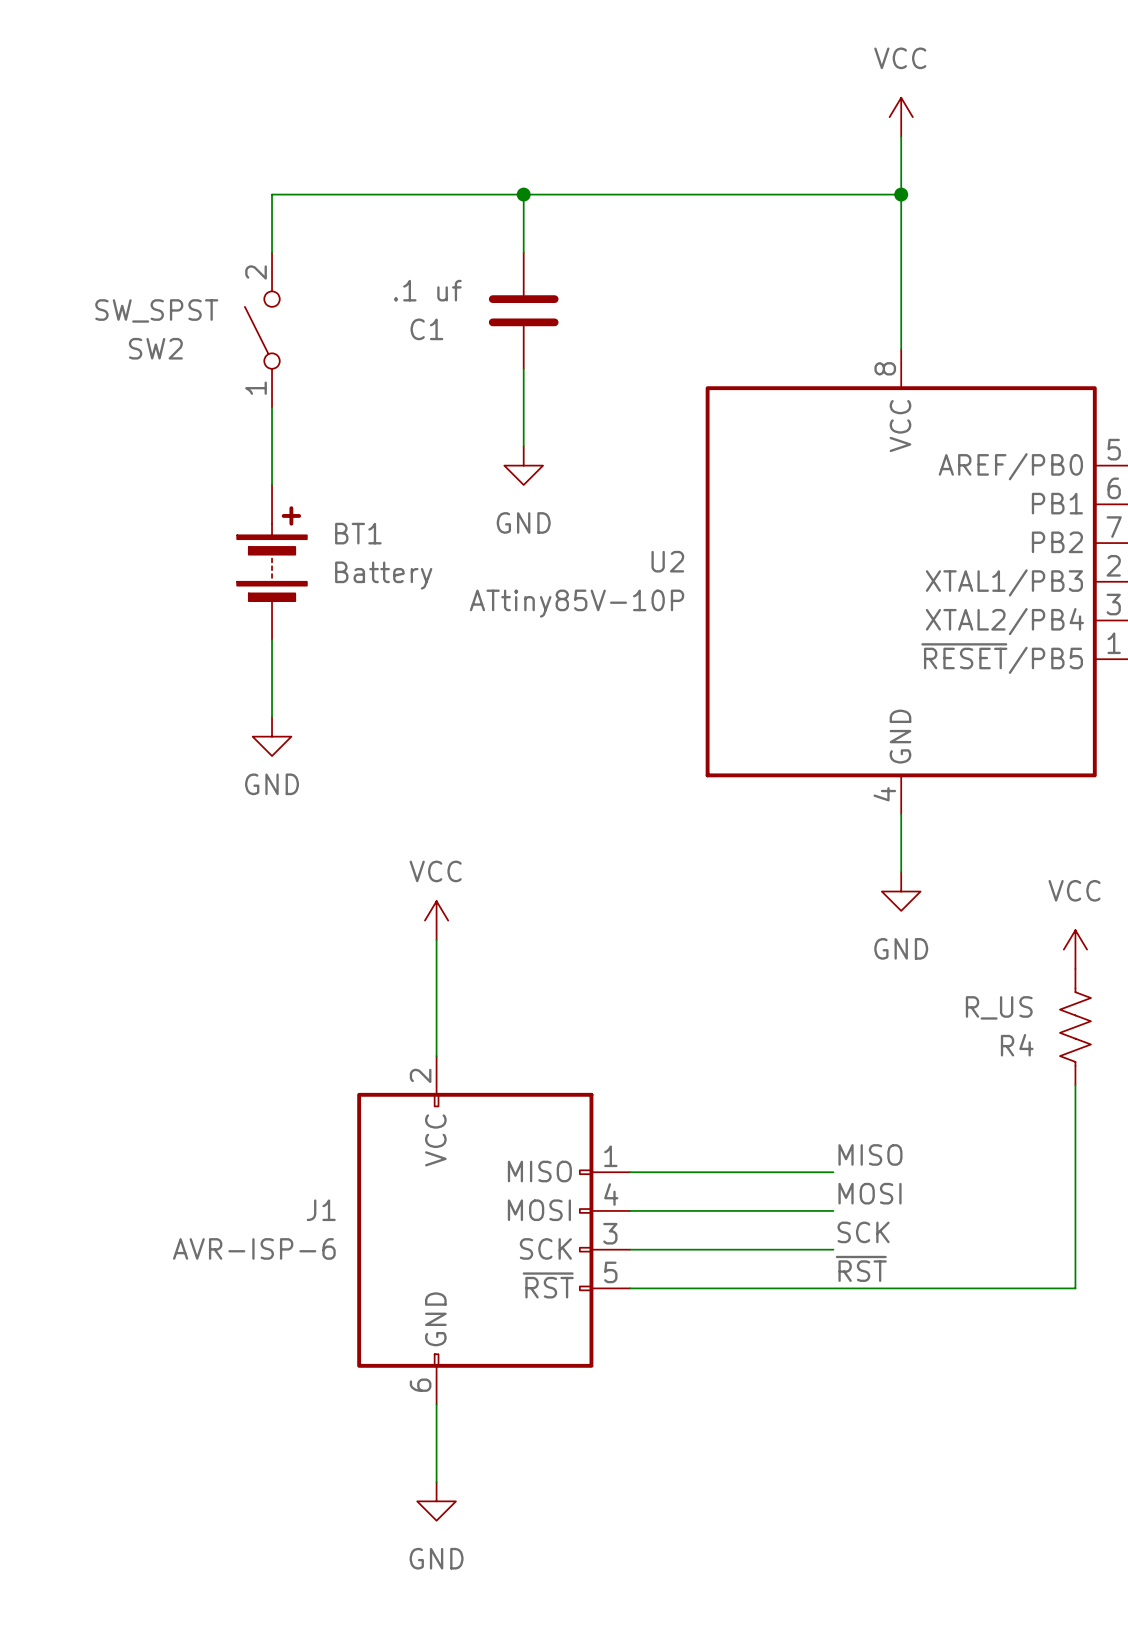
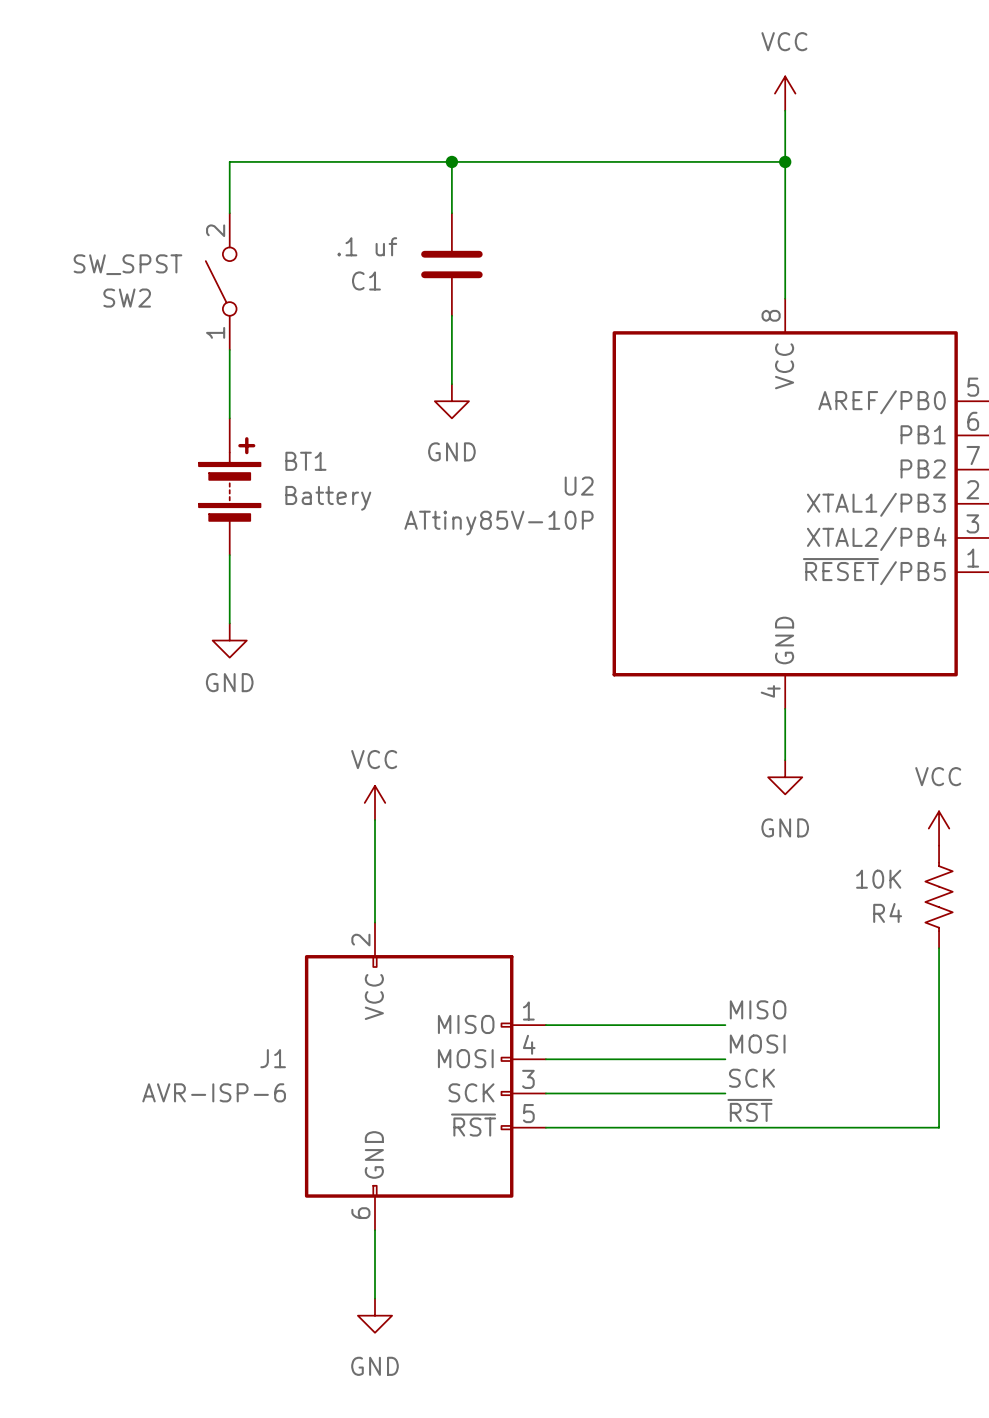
R4 value: R_US (999, 1007) -> 10K (878, 879)

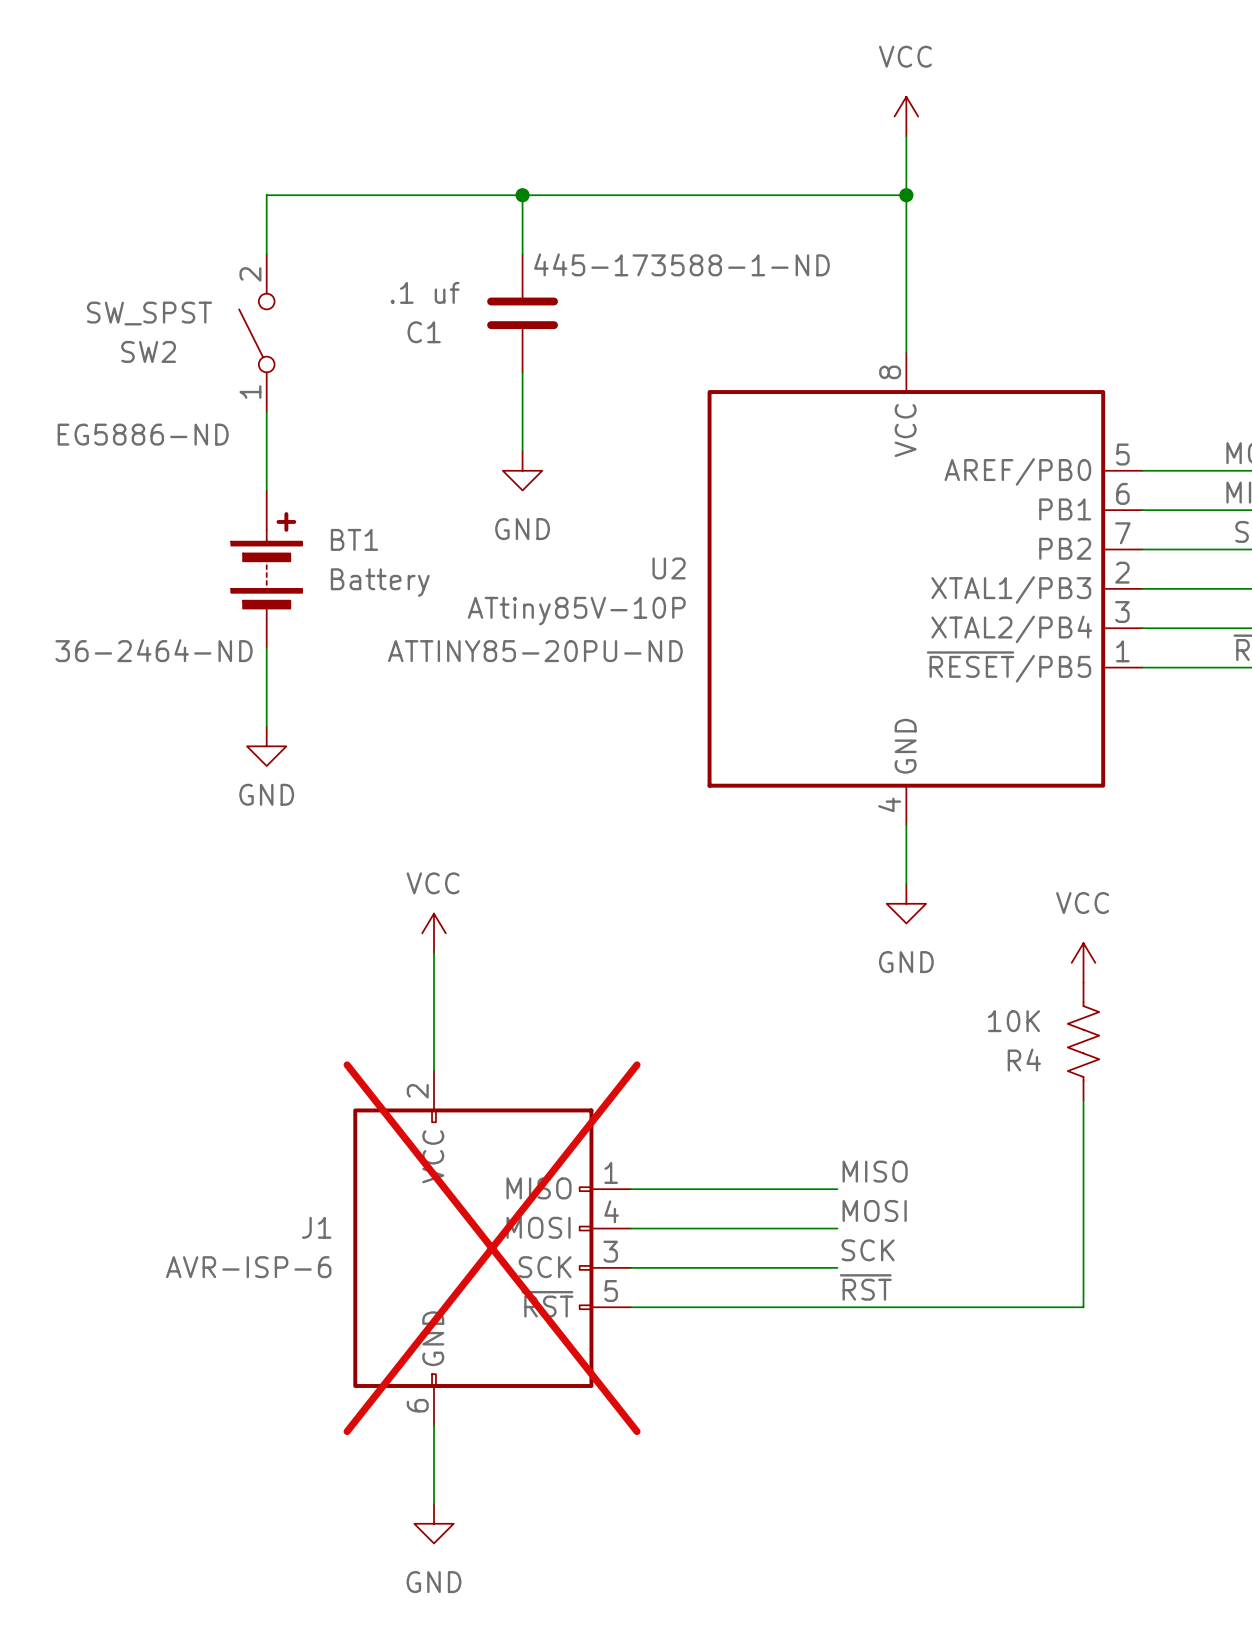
C1 text: none -> 445-173588-1-ND (681, 264)
SW2 text: none -> EG5886-ND (143, 434)
BT1 text: none -> 36-2464-ND (154, 650)
U2 text: none -> ATTINY85-20PU-ND (535, 651)
J1 do-not-place cross: none -> (492, 1248)

